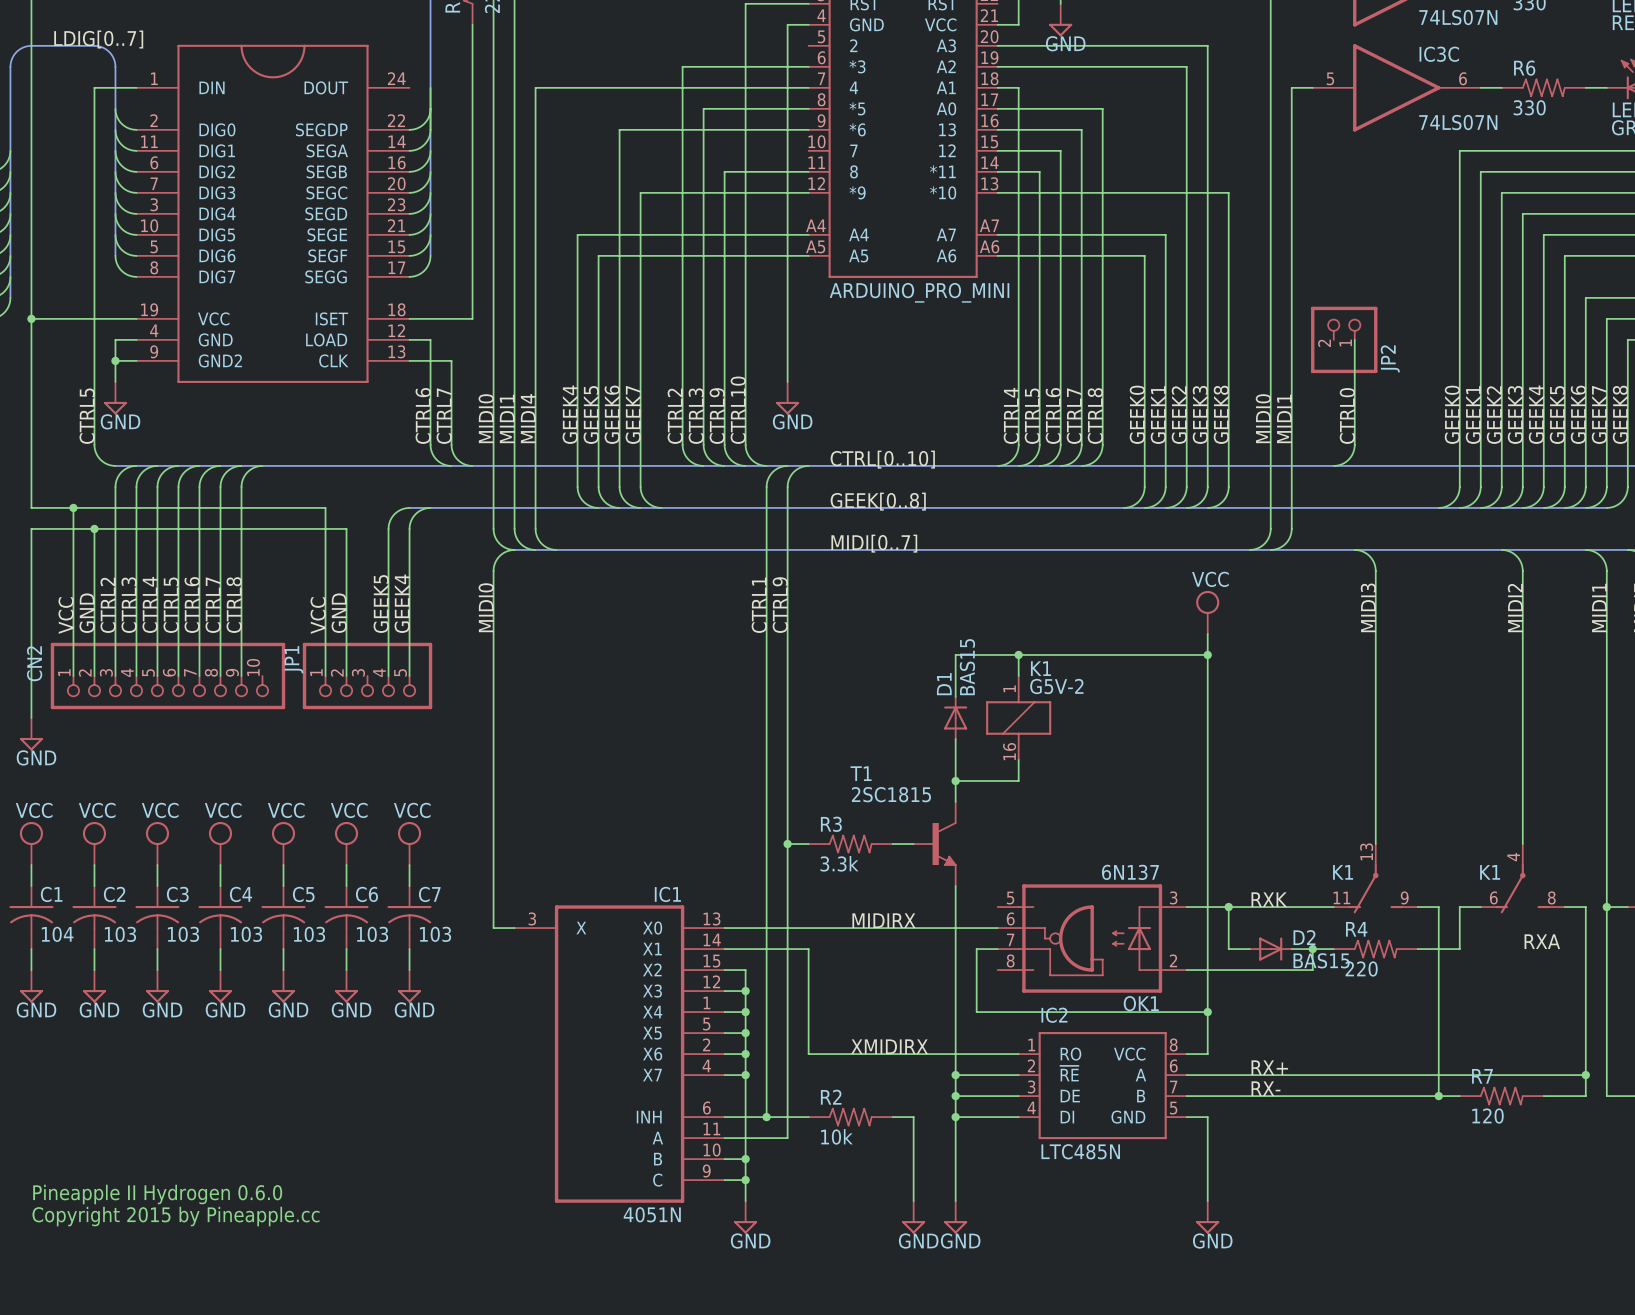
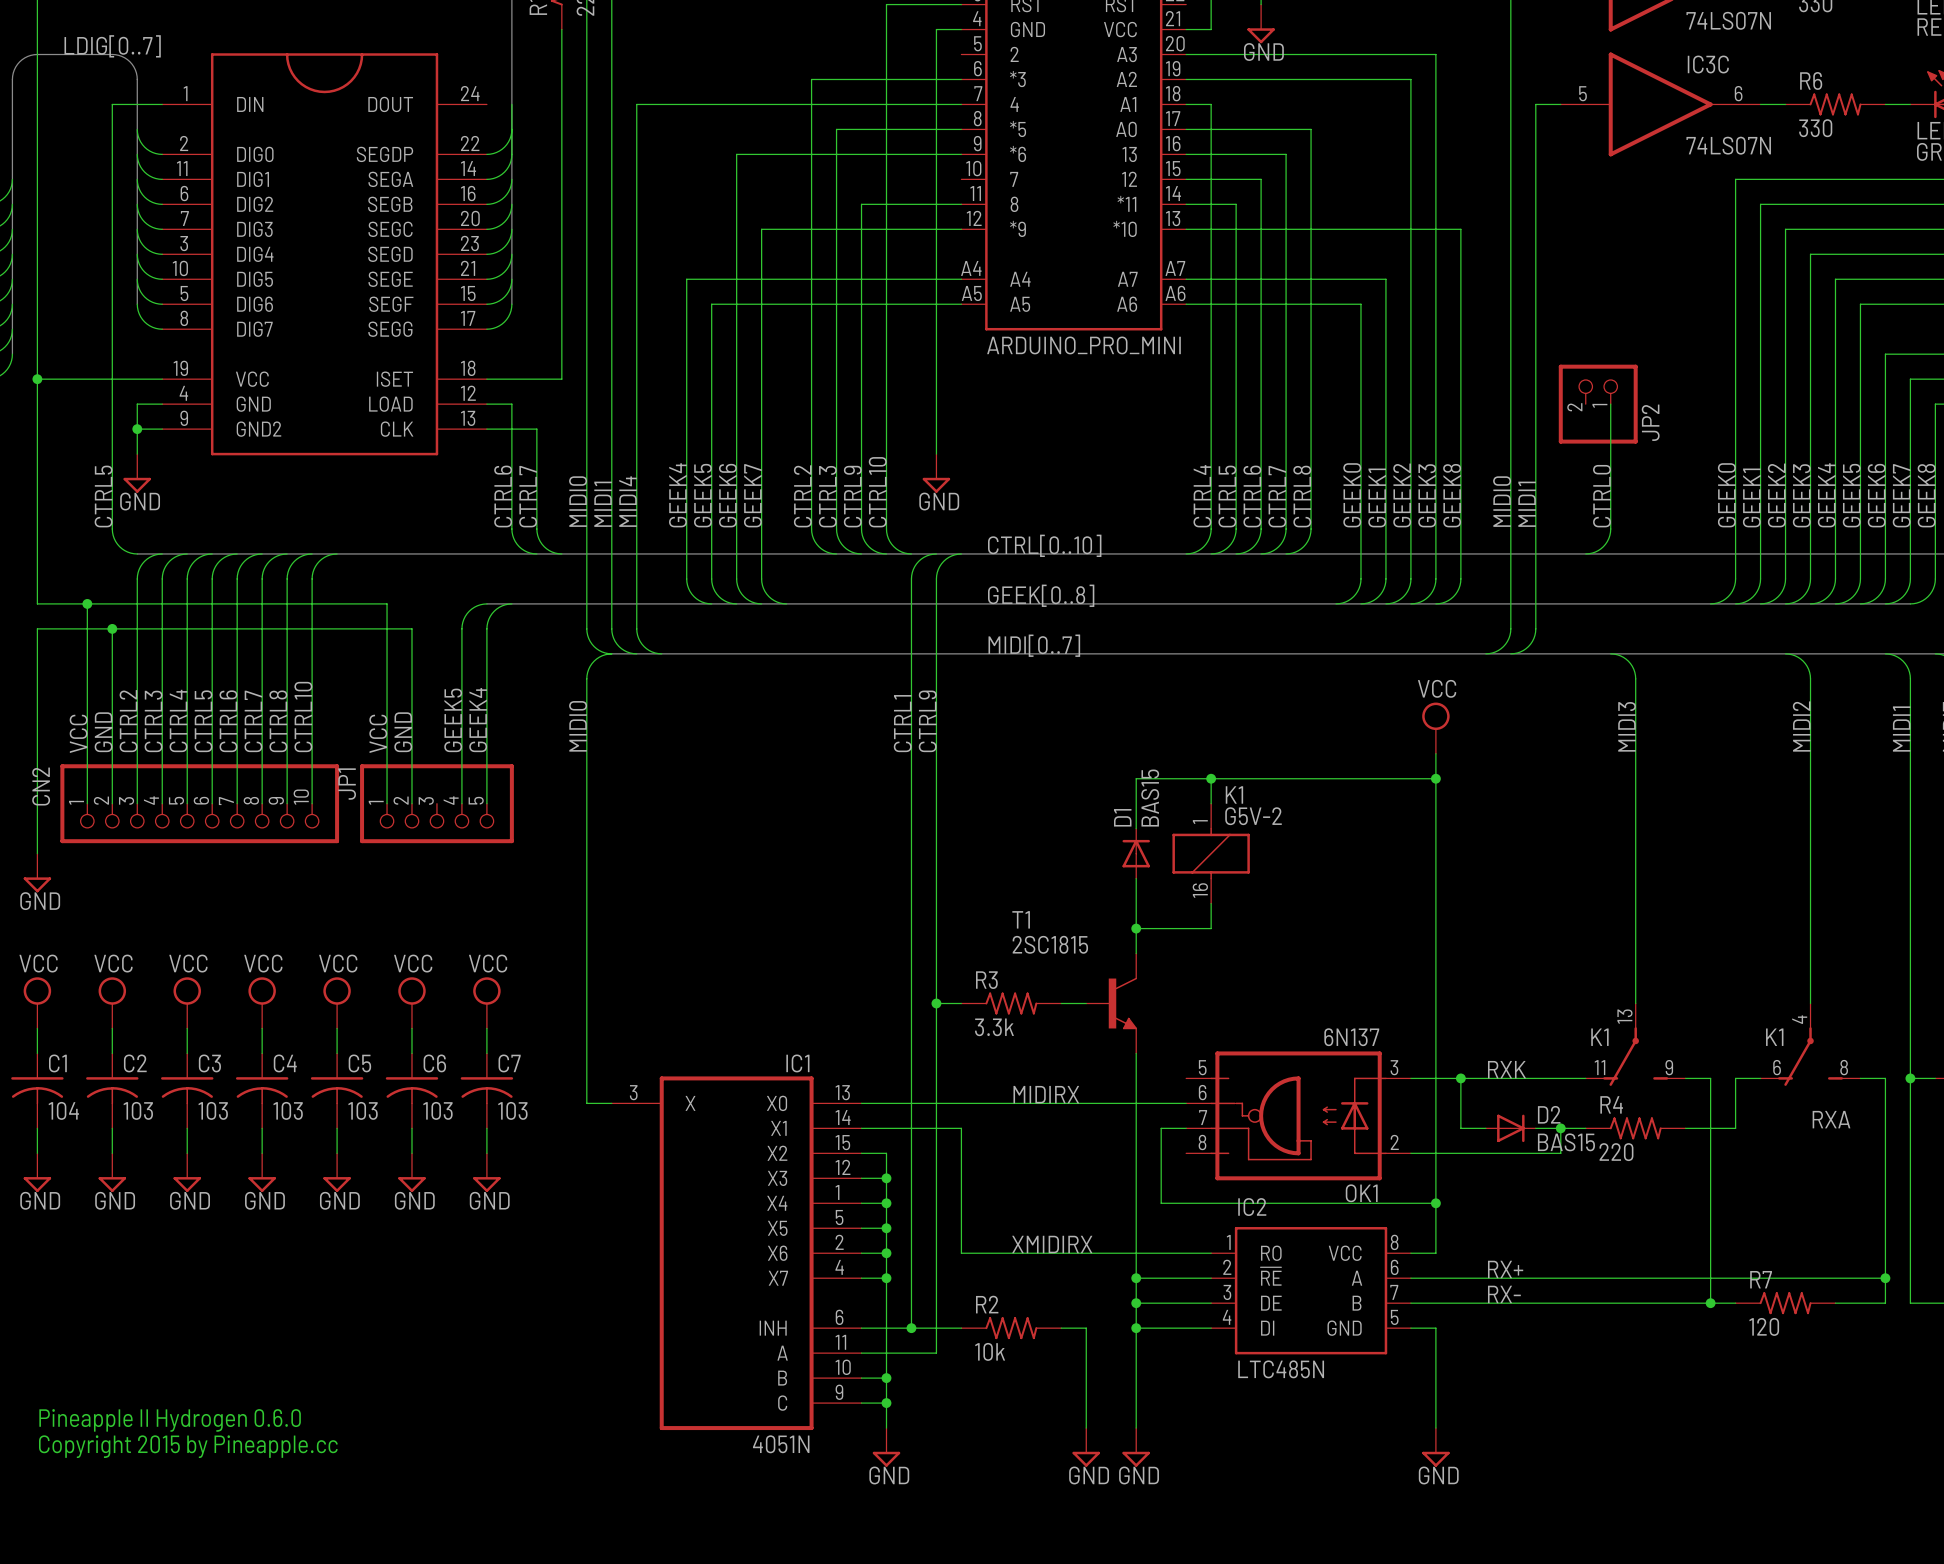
wire: none -> (337, 553) (327, 555) (319, 561) (312, 575) (312, 803)
label: none -> CTRL10 (303, 716)

